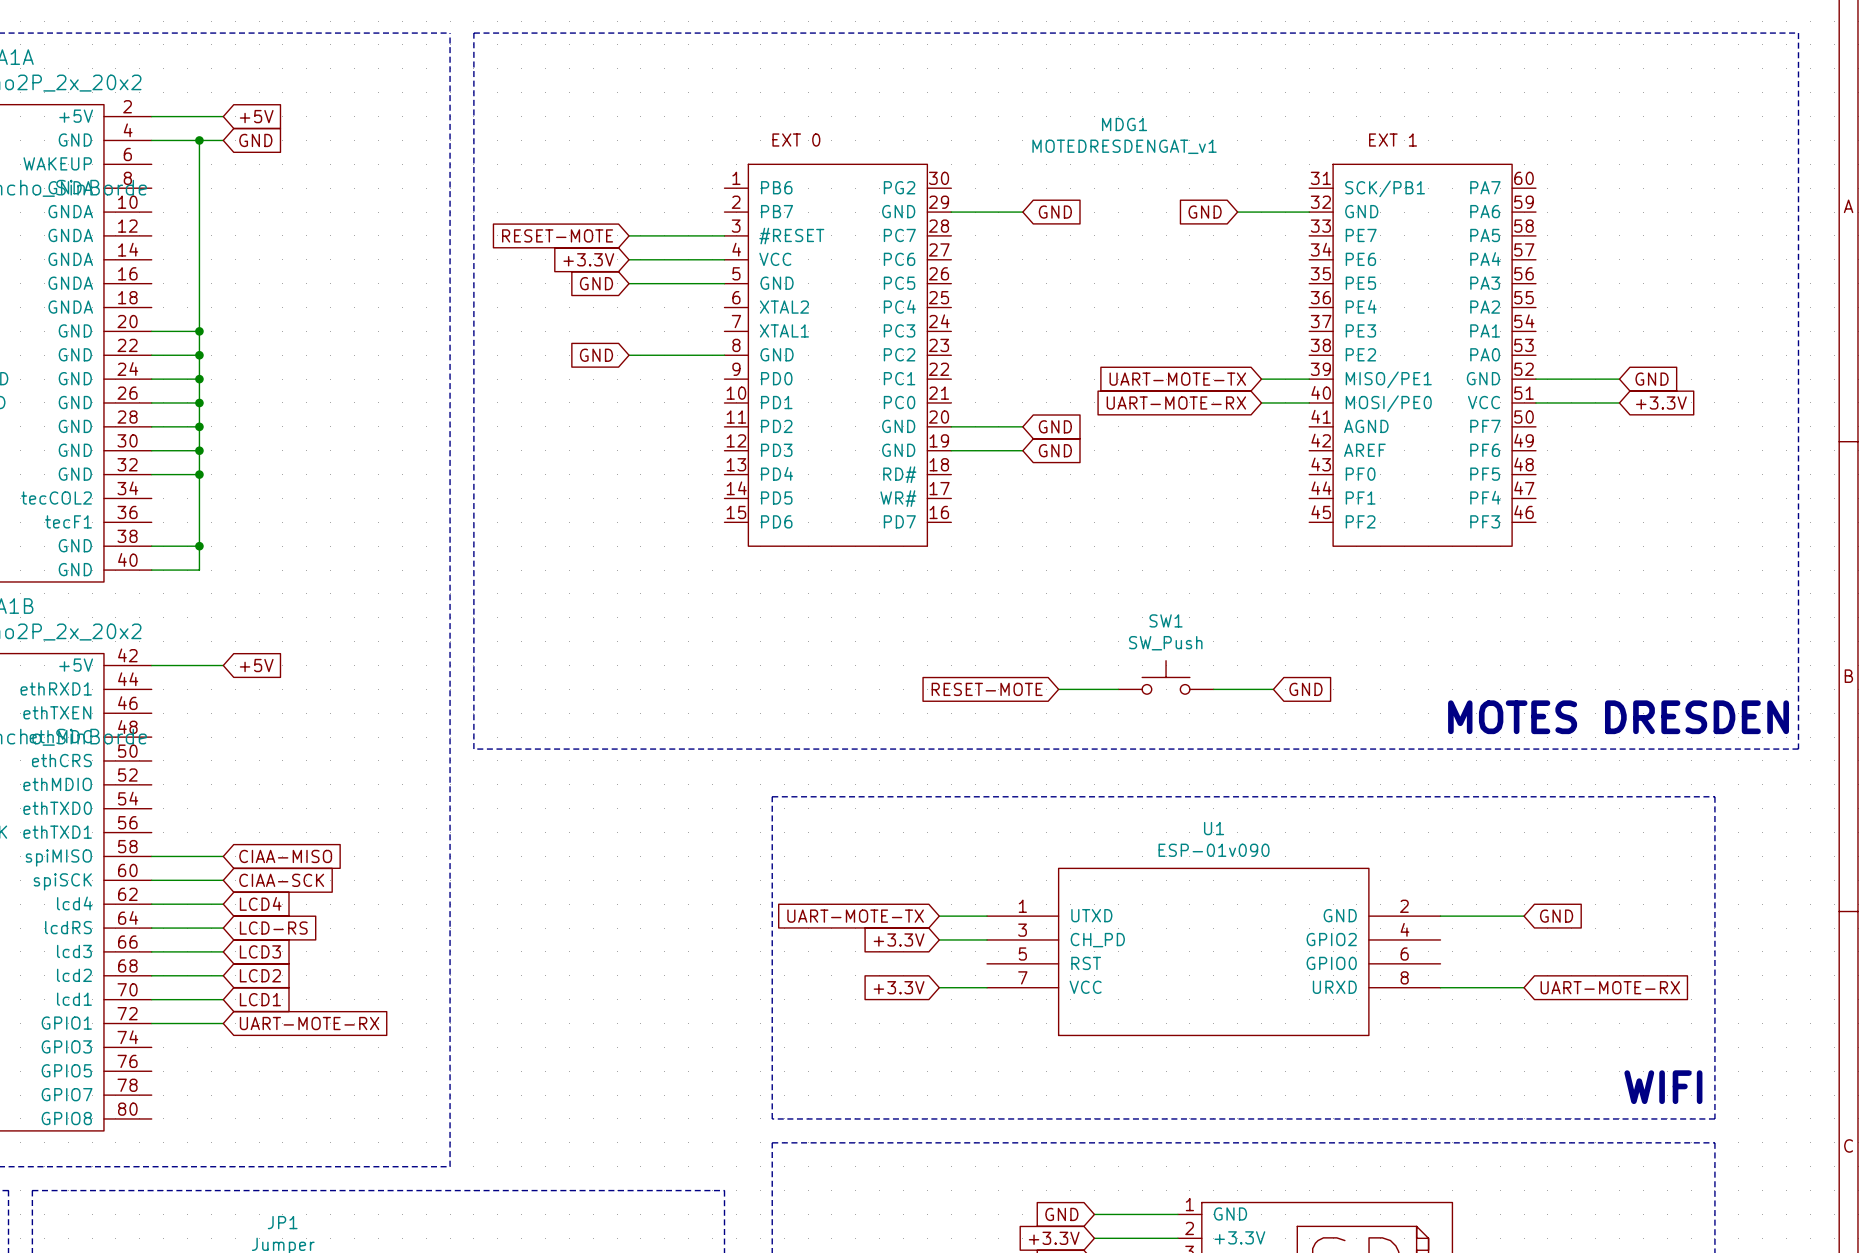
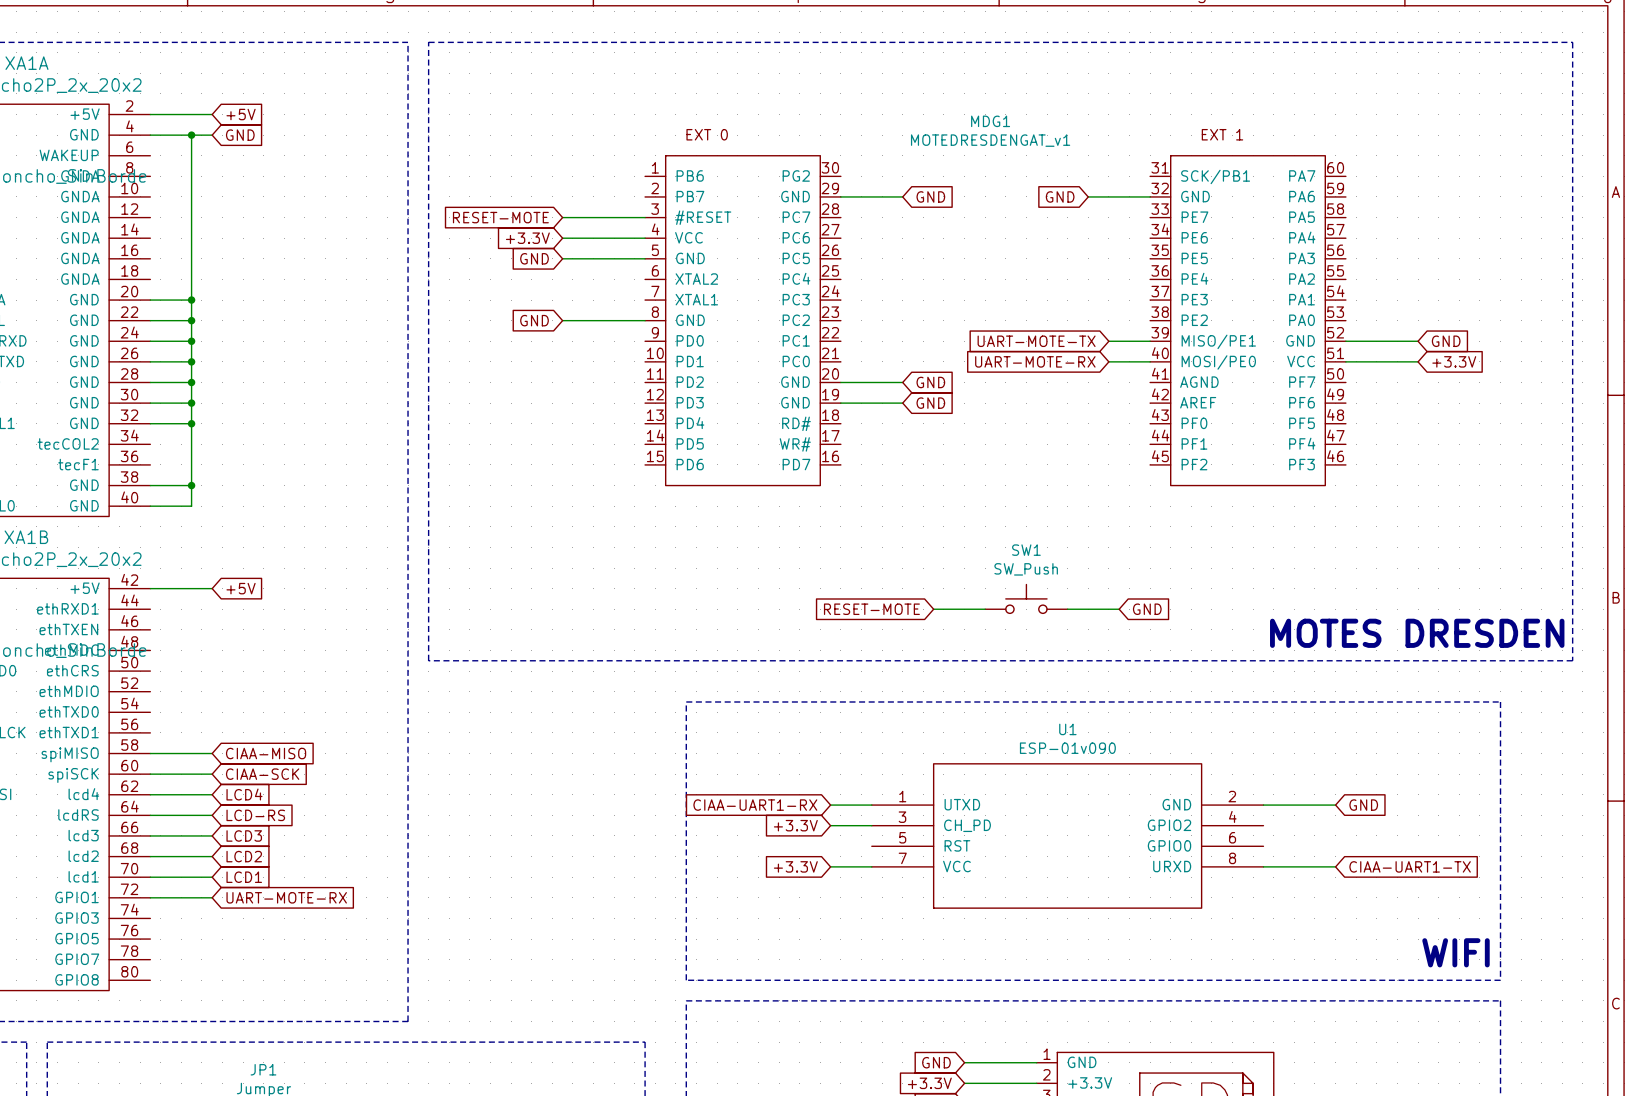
global label: UART-MOTE-TX (855, 916) -> CIAA-UART1-RX (755, 805)
global label: UART-MOTE-RX (1610, 987) -> CIAA-UART1-TX (1410, 866)

